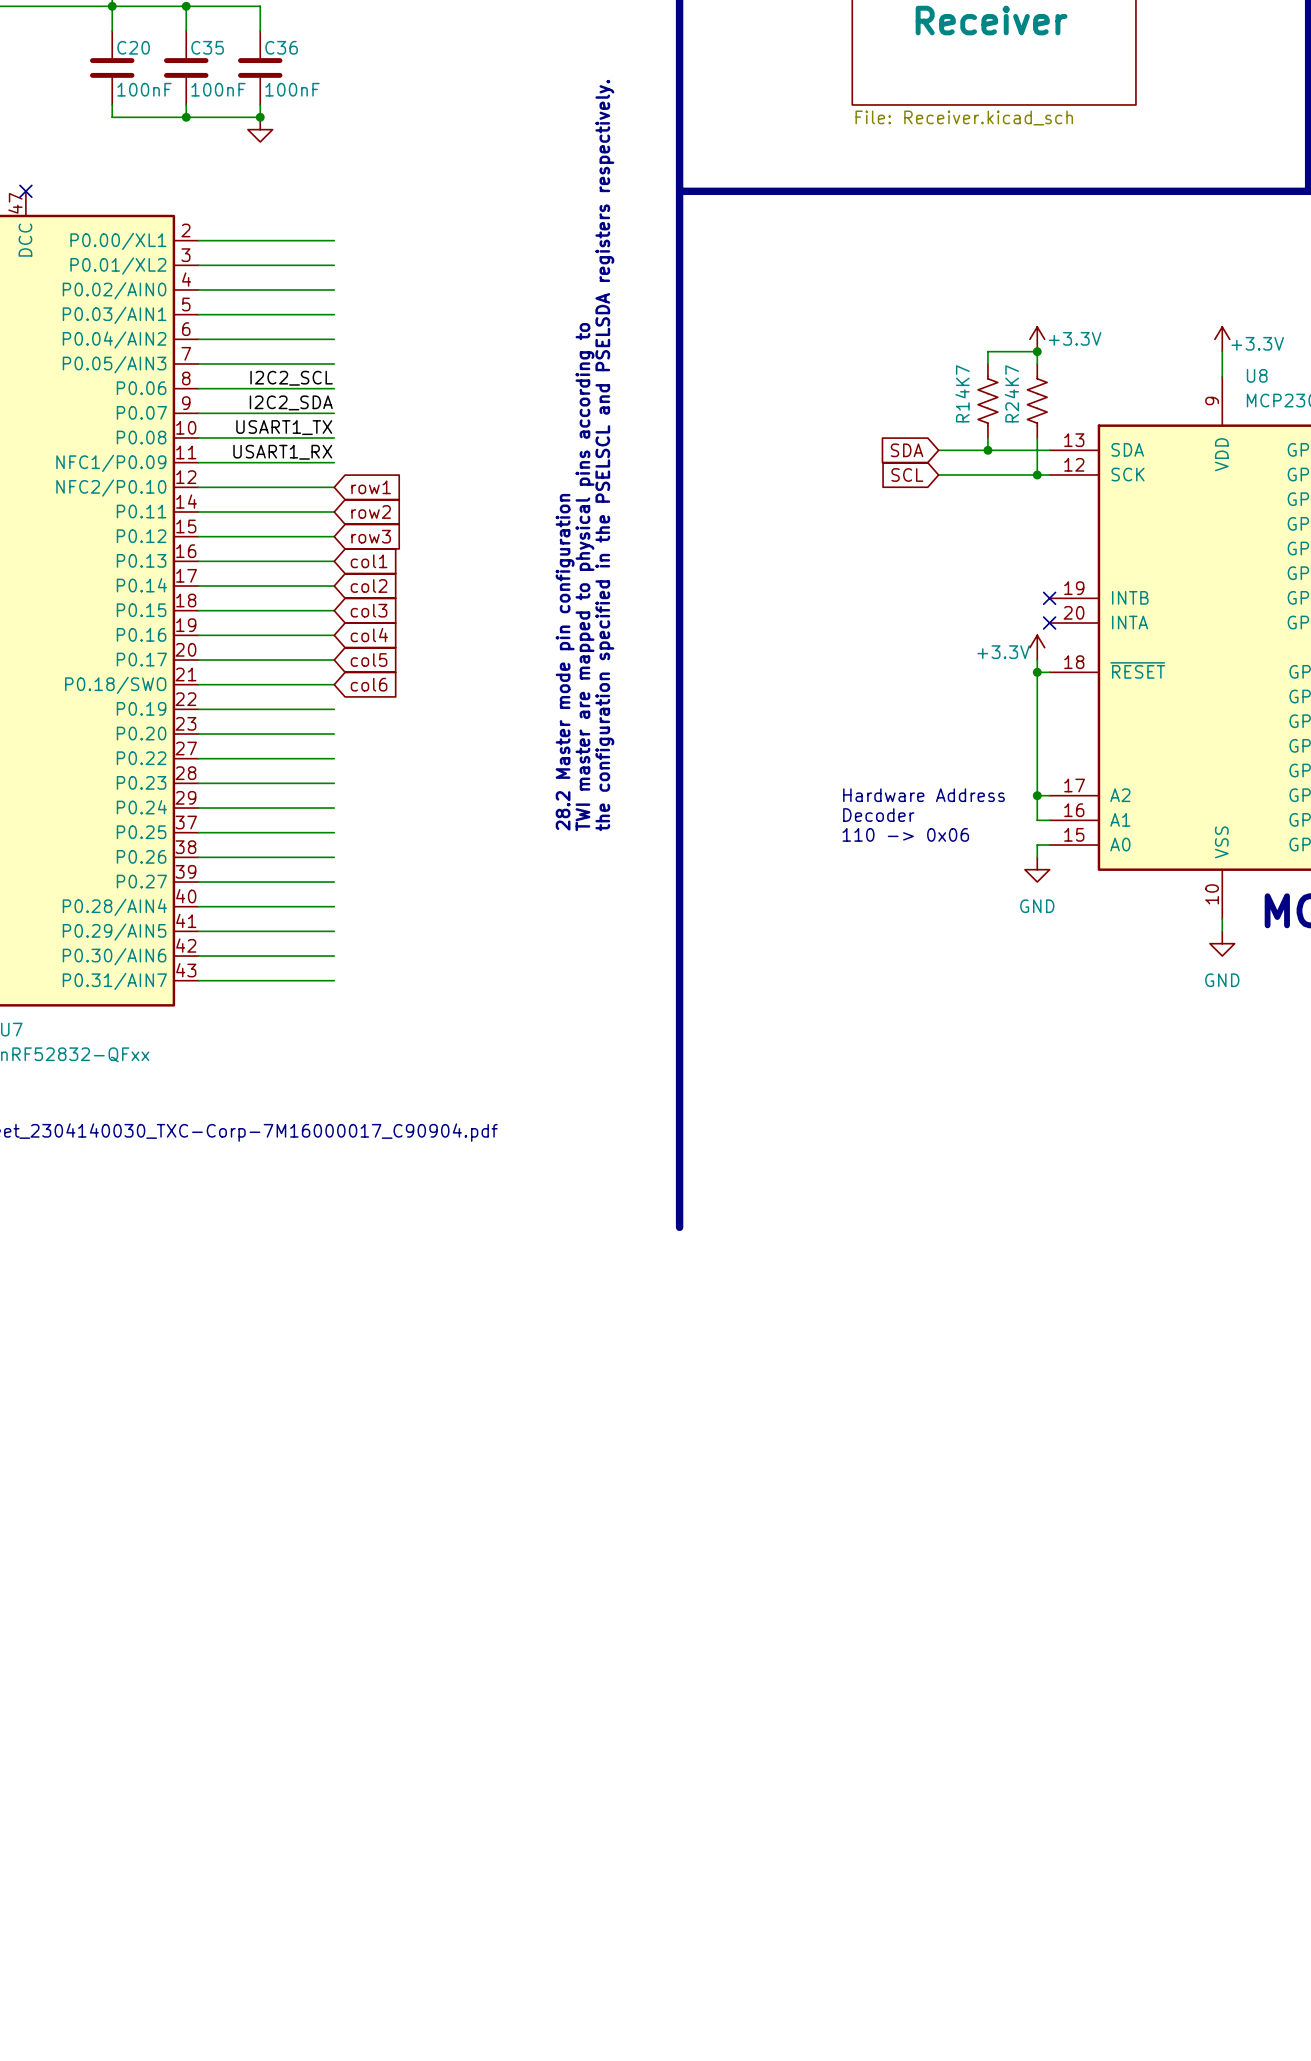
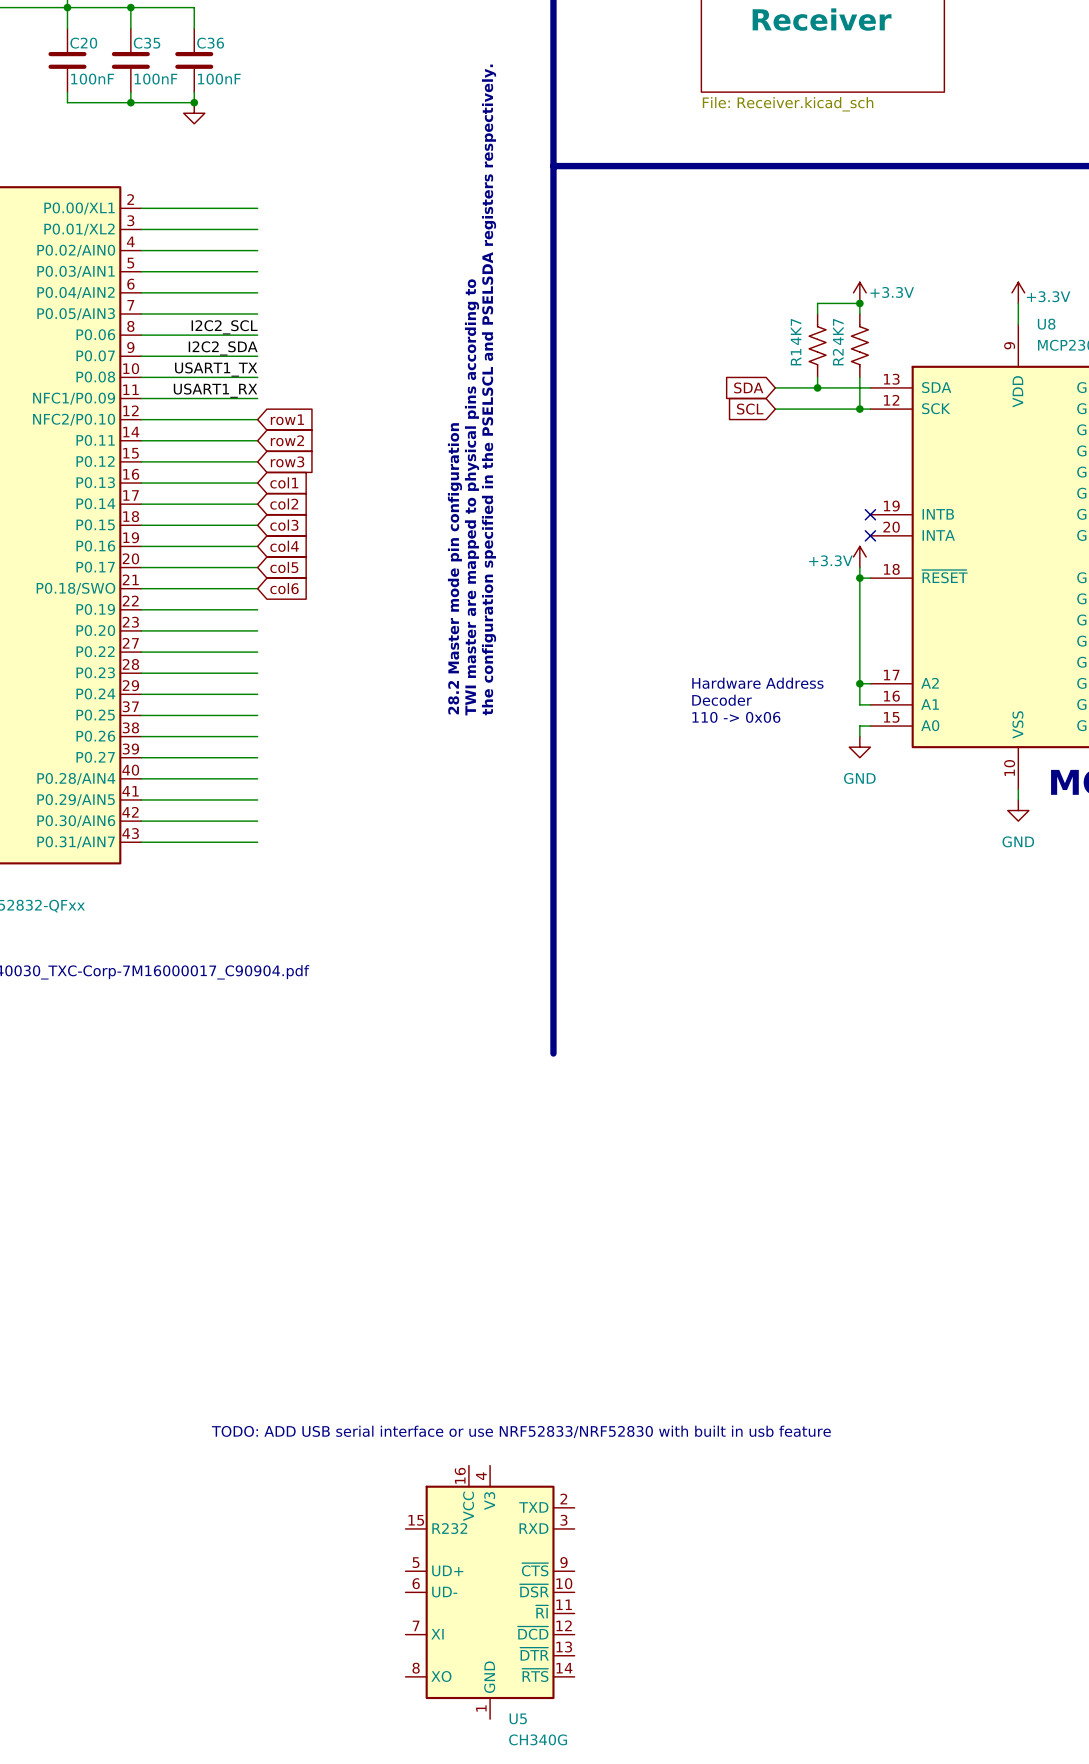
text: none -> TODO: ADD USB serial interface or use NRF52833/NRF52830 with built in usb feature (521, 1431)
U5: none -> CH340G (490, 1592)

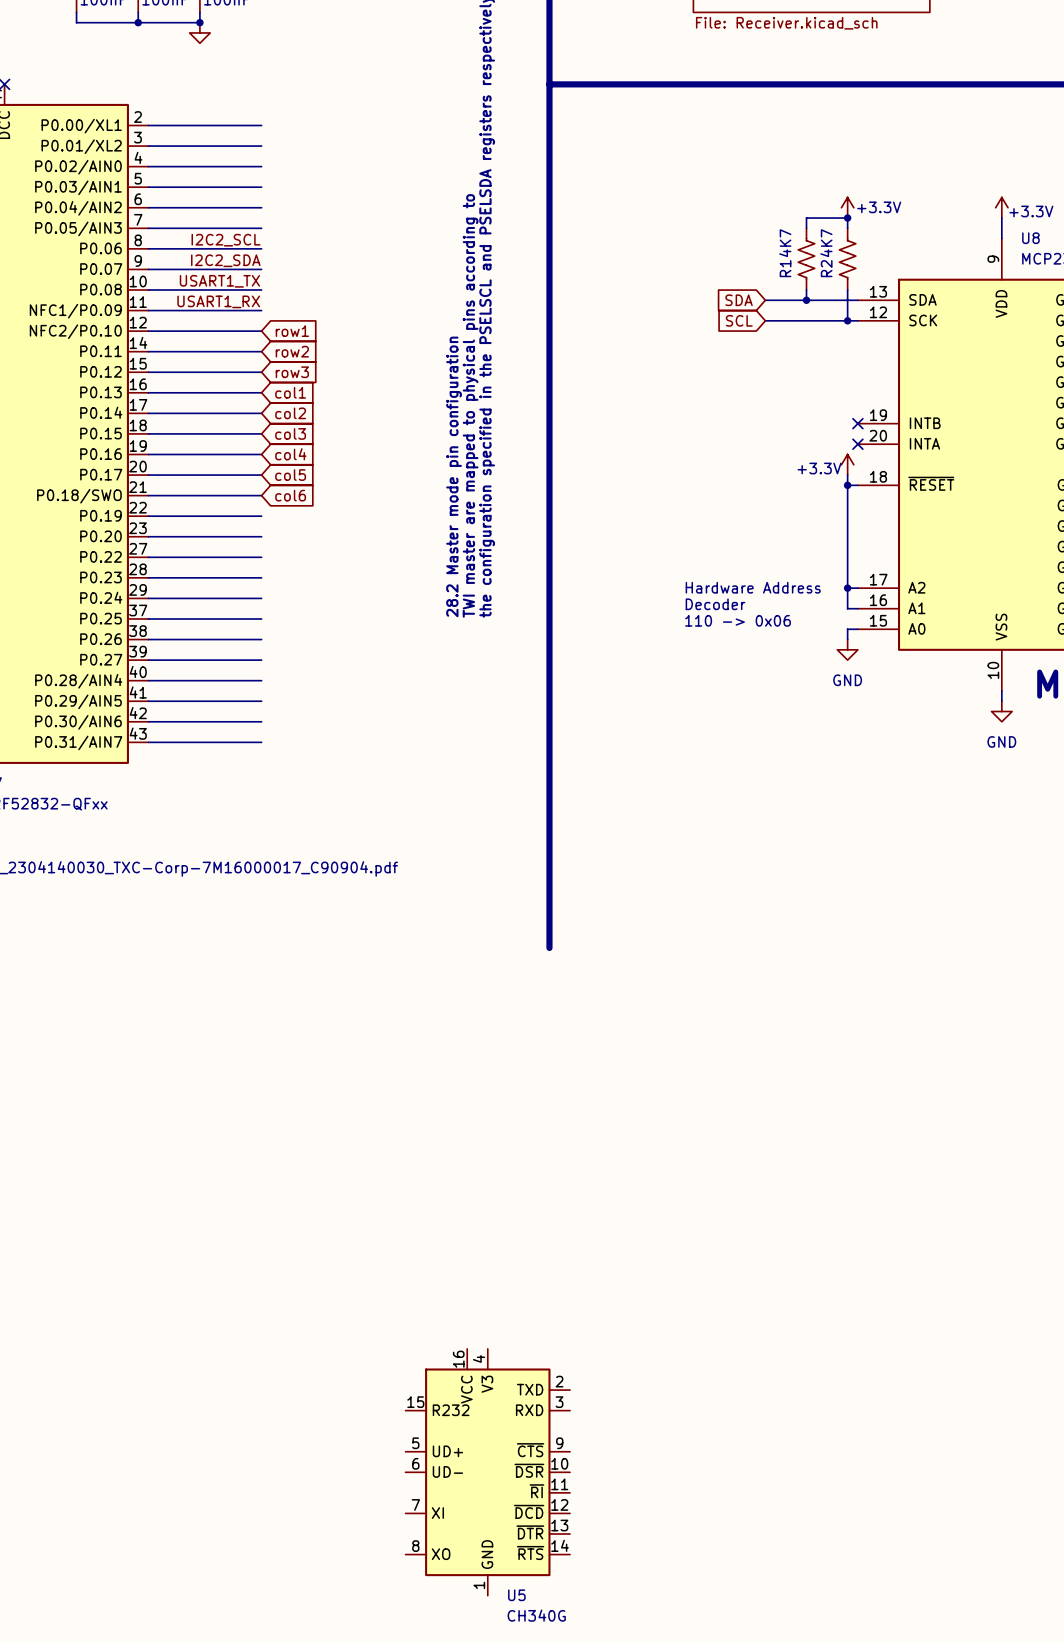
text: TODO: ADD USB serial interface or use NRF52833/NRF52830 with built in usb feature (521, 1431) -> none

